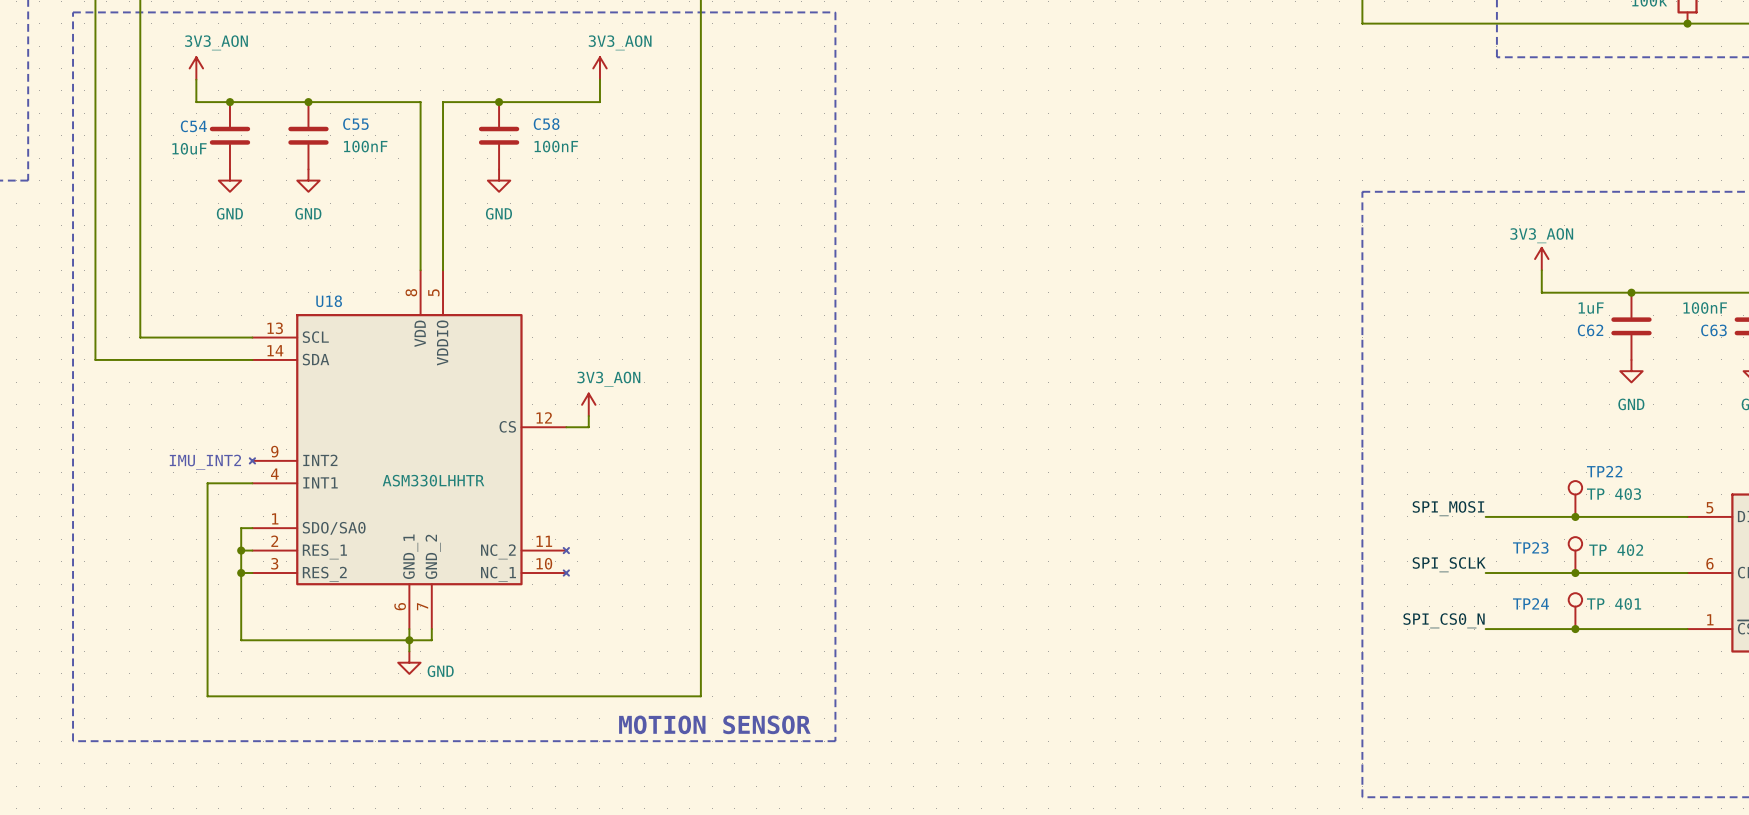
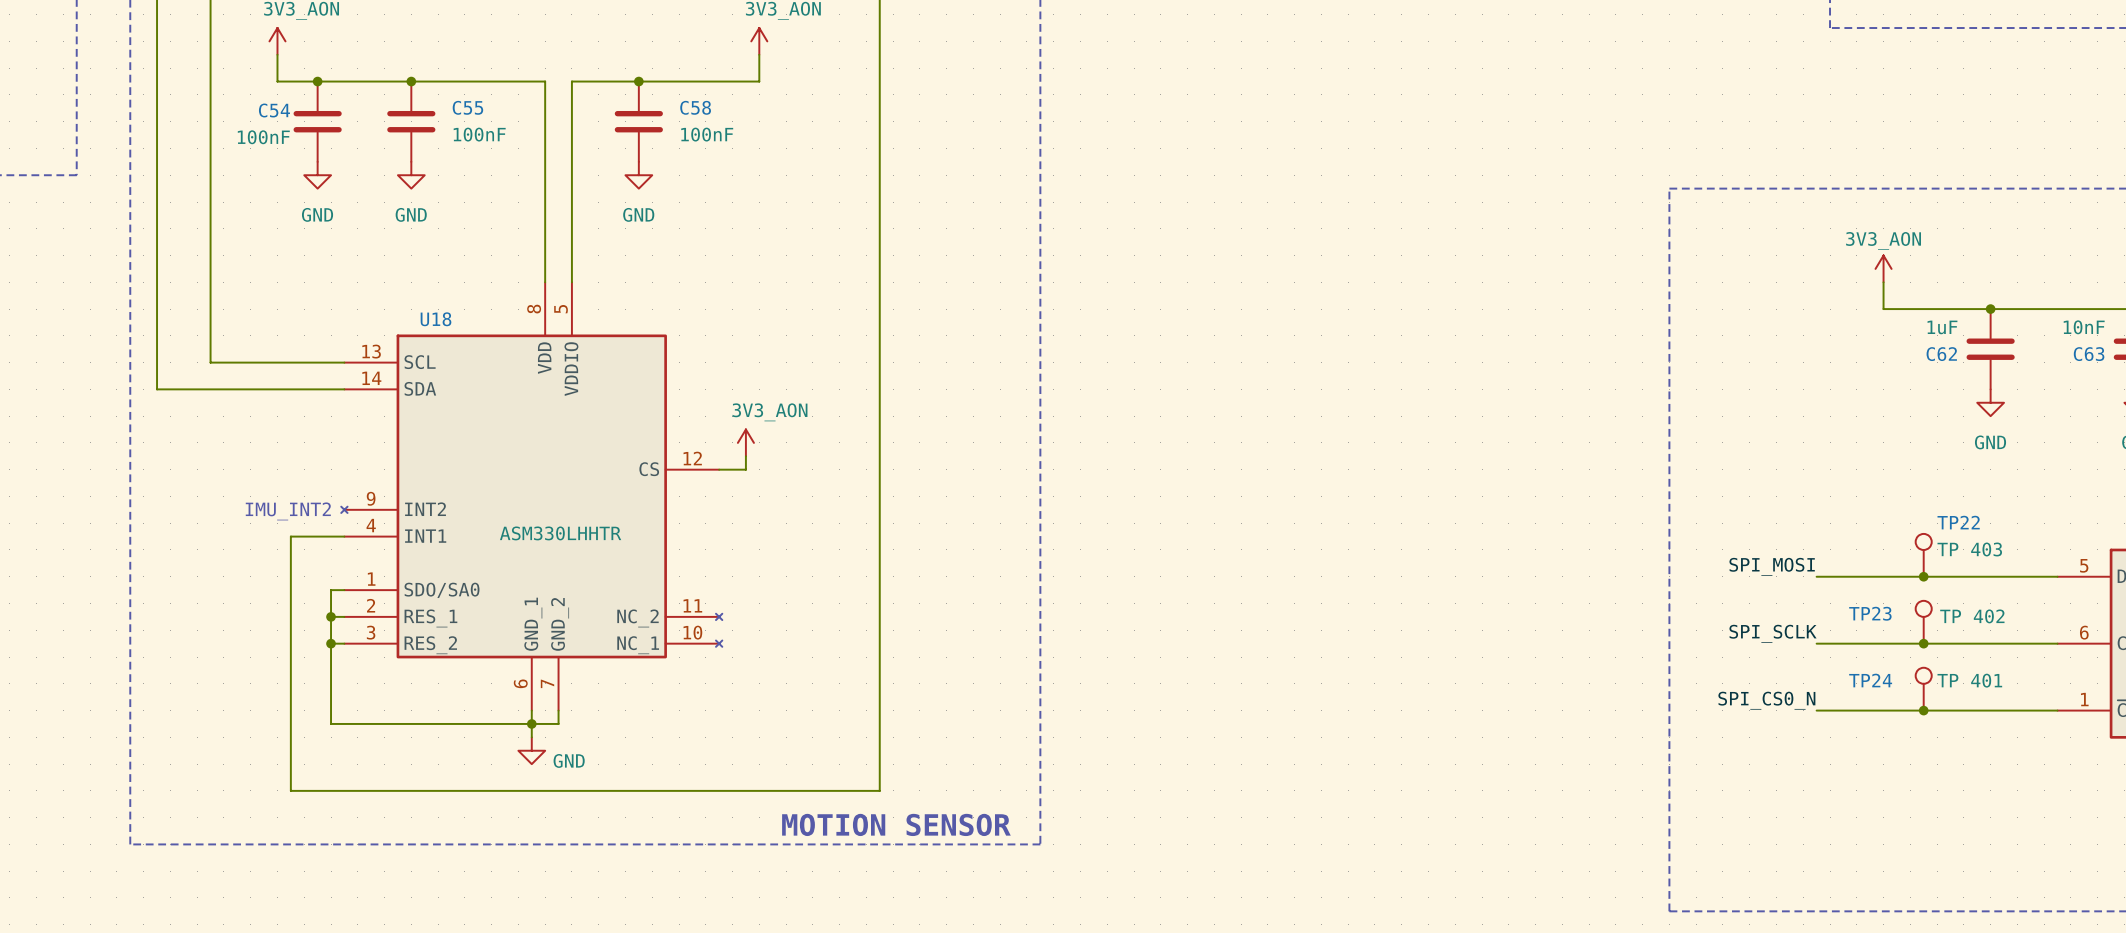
C54 value: 10uF (189, 148) -> 100nF (263, 137)
C63 value: 100nF (1705, 307) -> 10nF (2084, 327)

